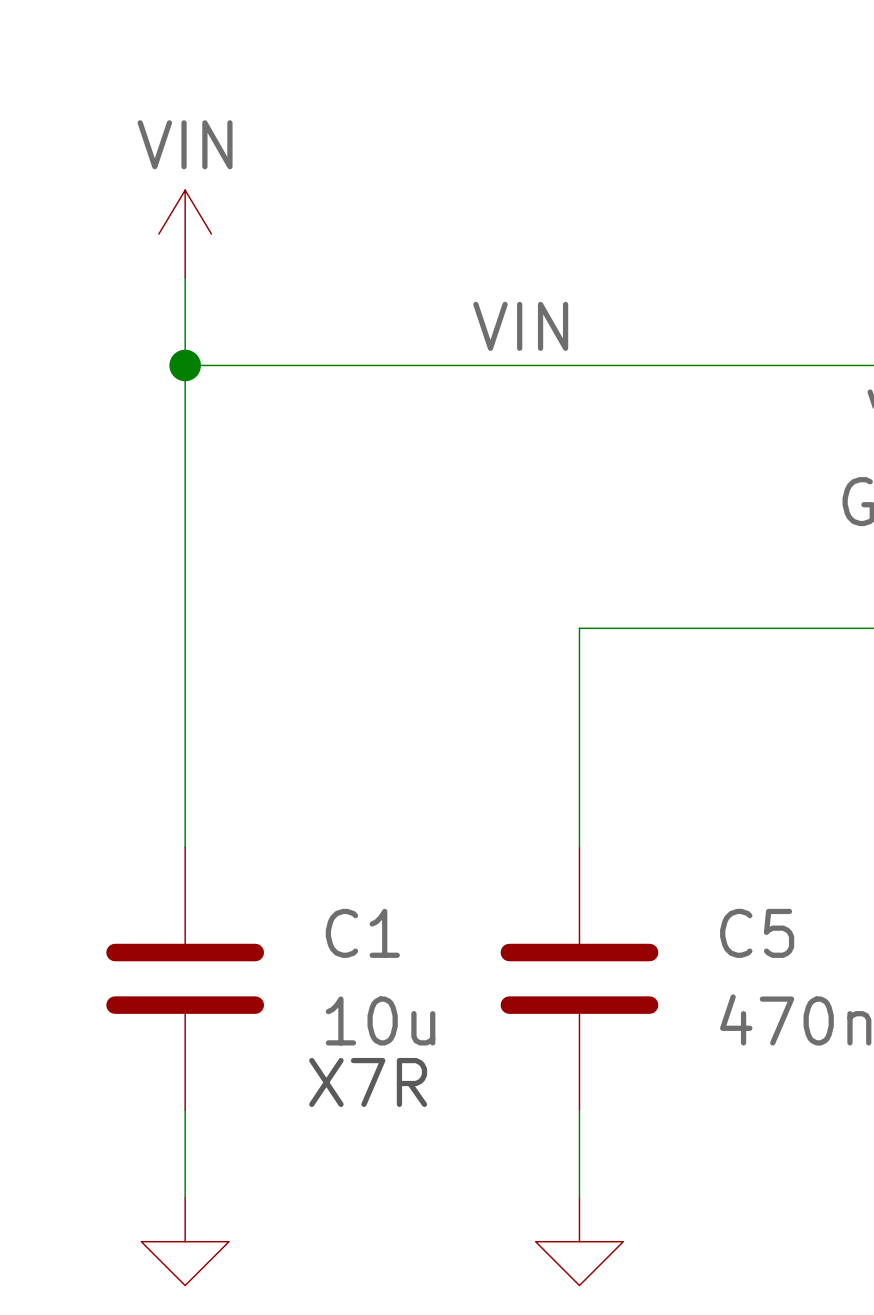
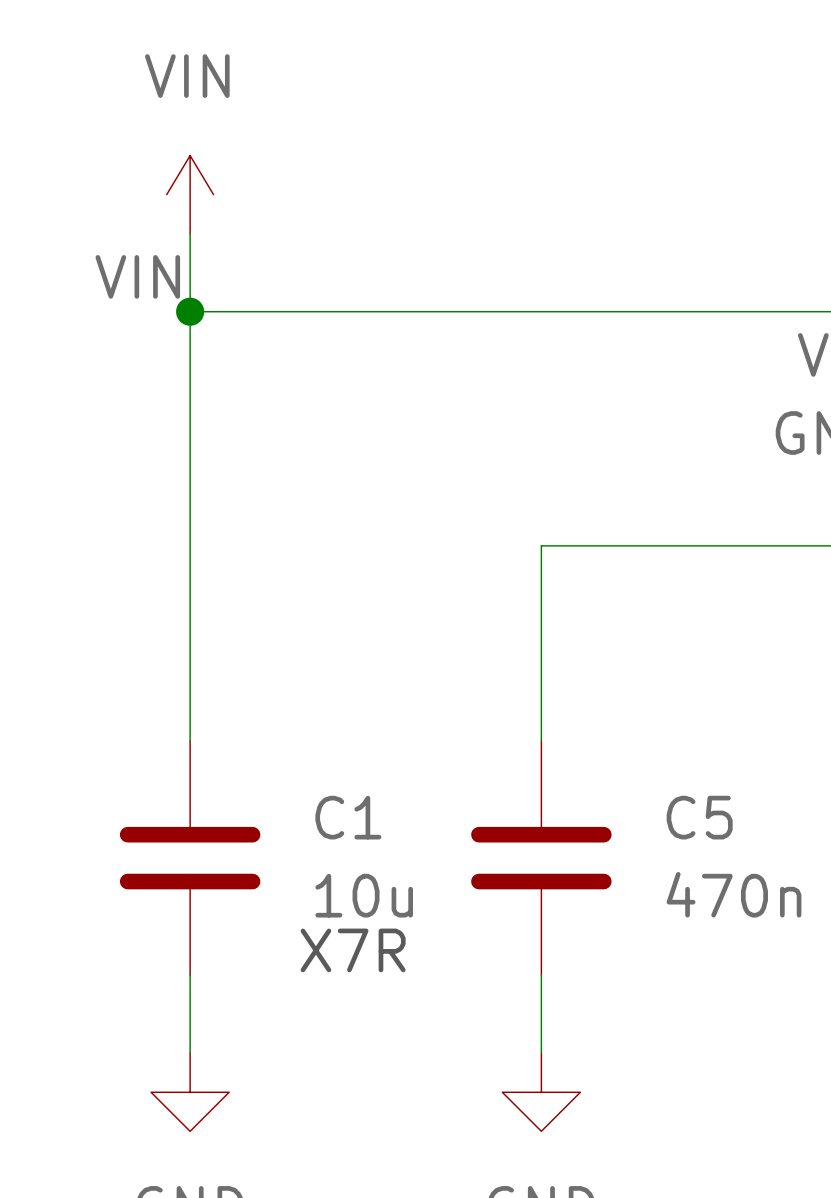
power symbol text position: VIN (185, 144) -> VIN (187, 76)
label position: VIN (520, 326) -> VIN (137, 276)

